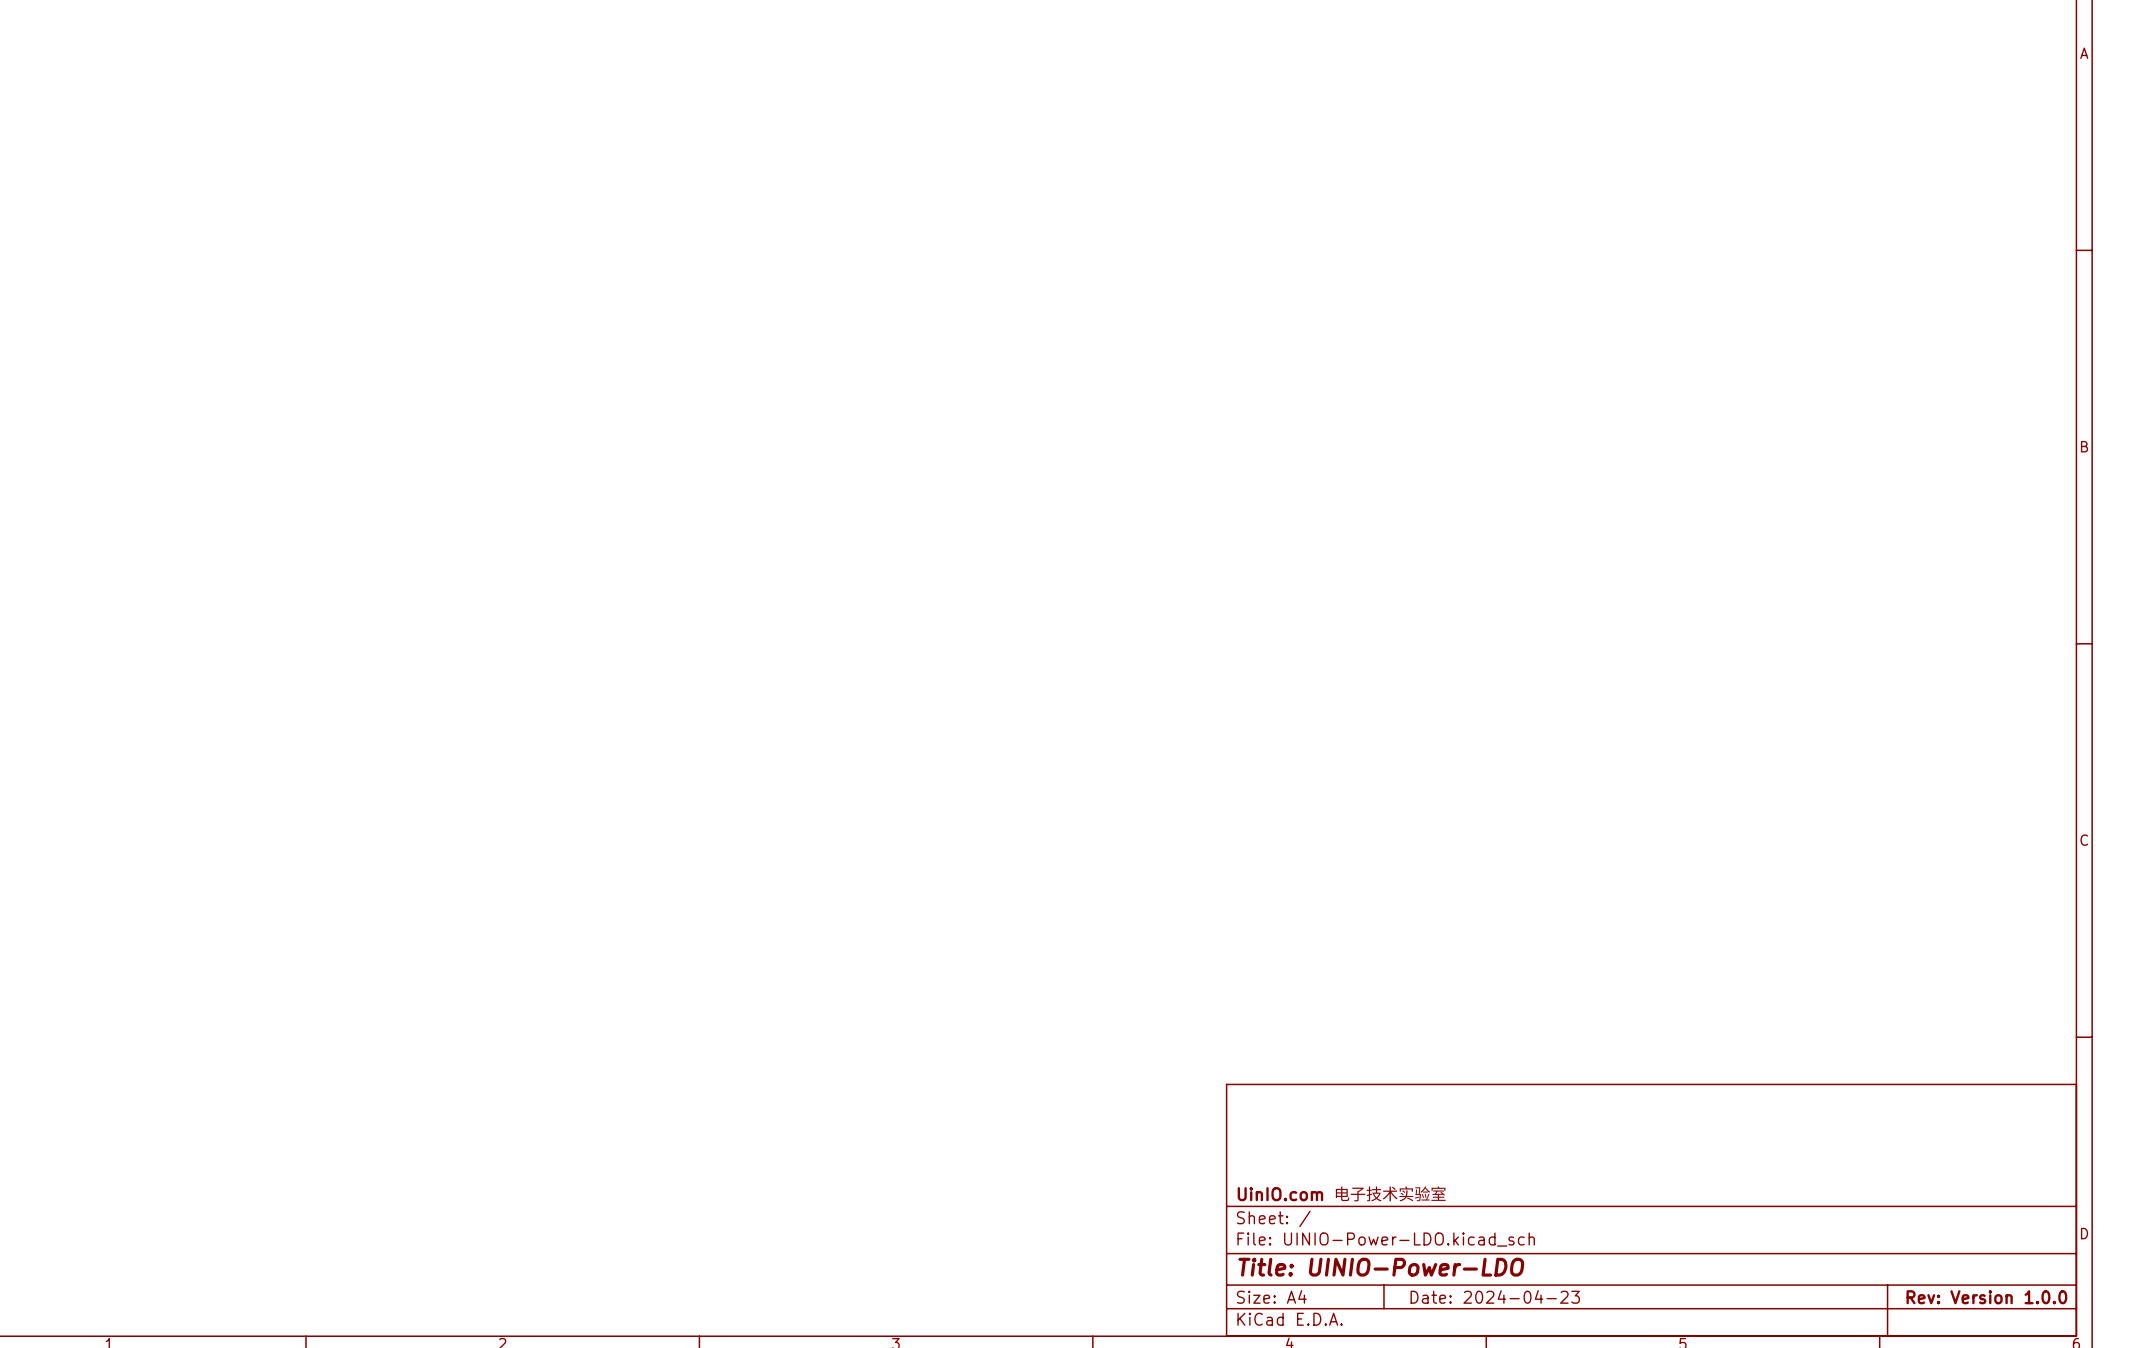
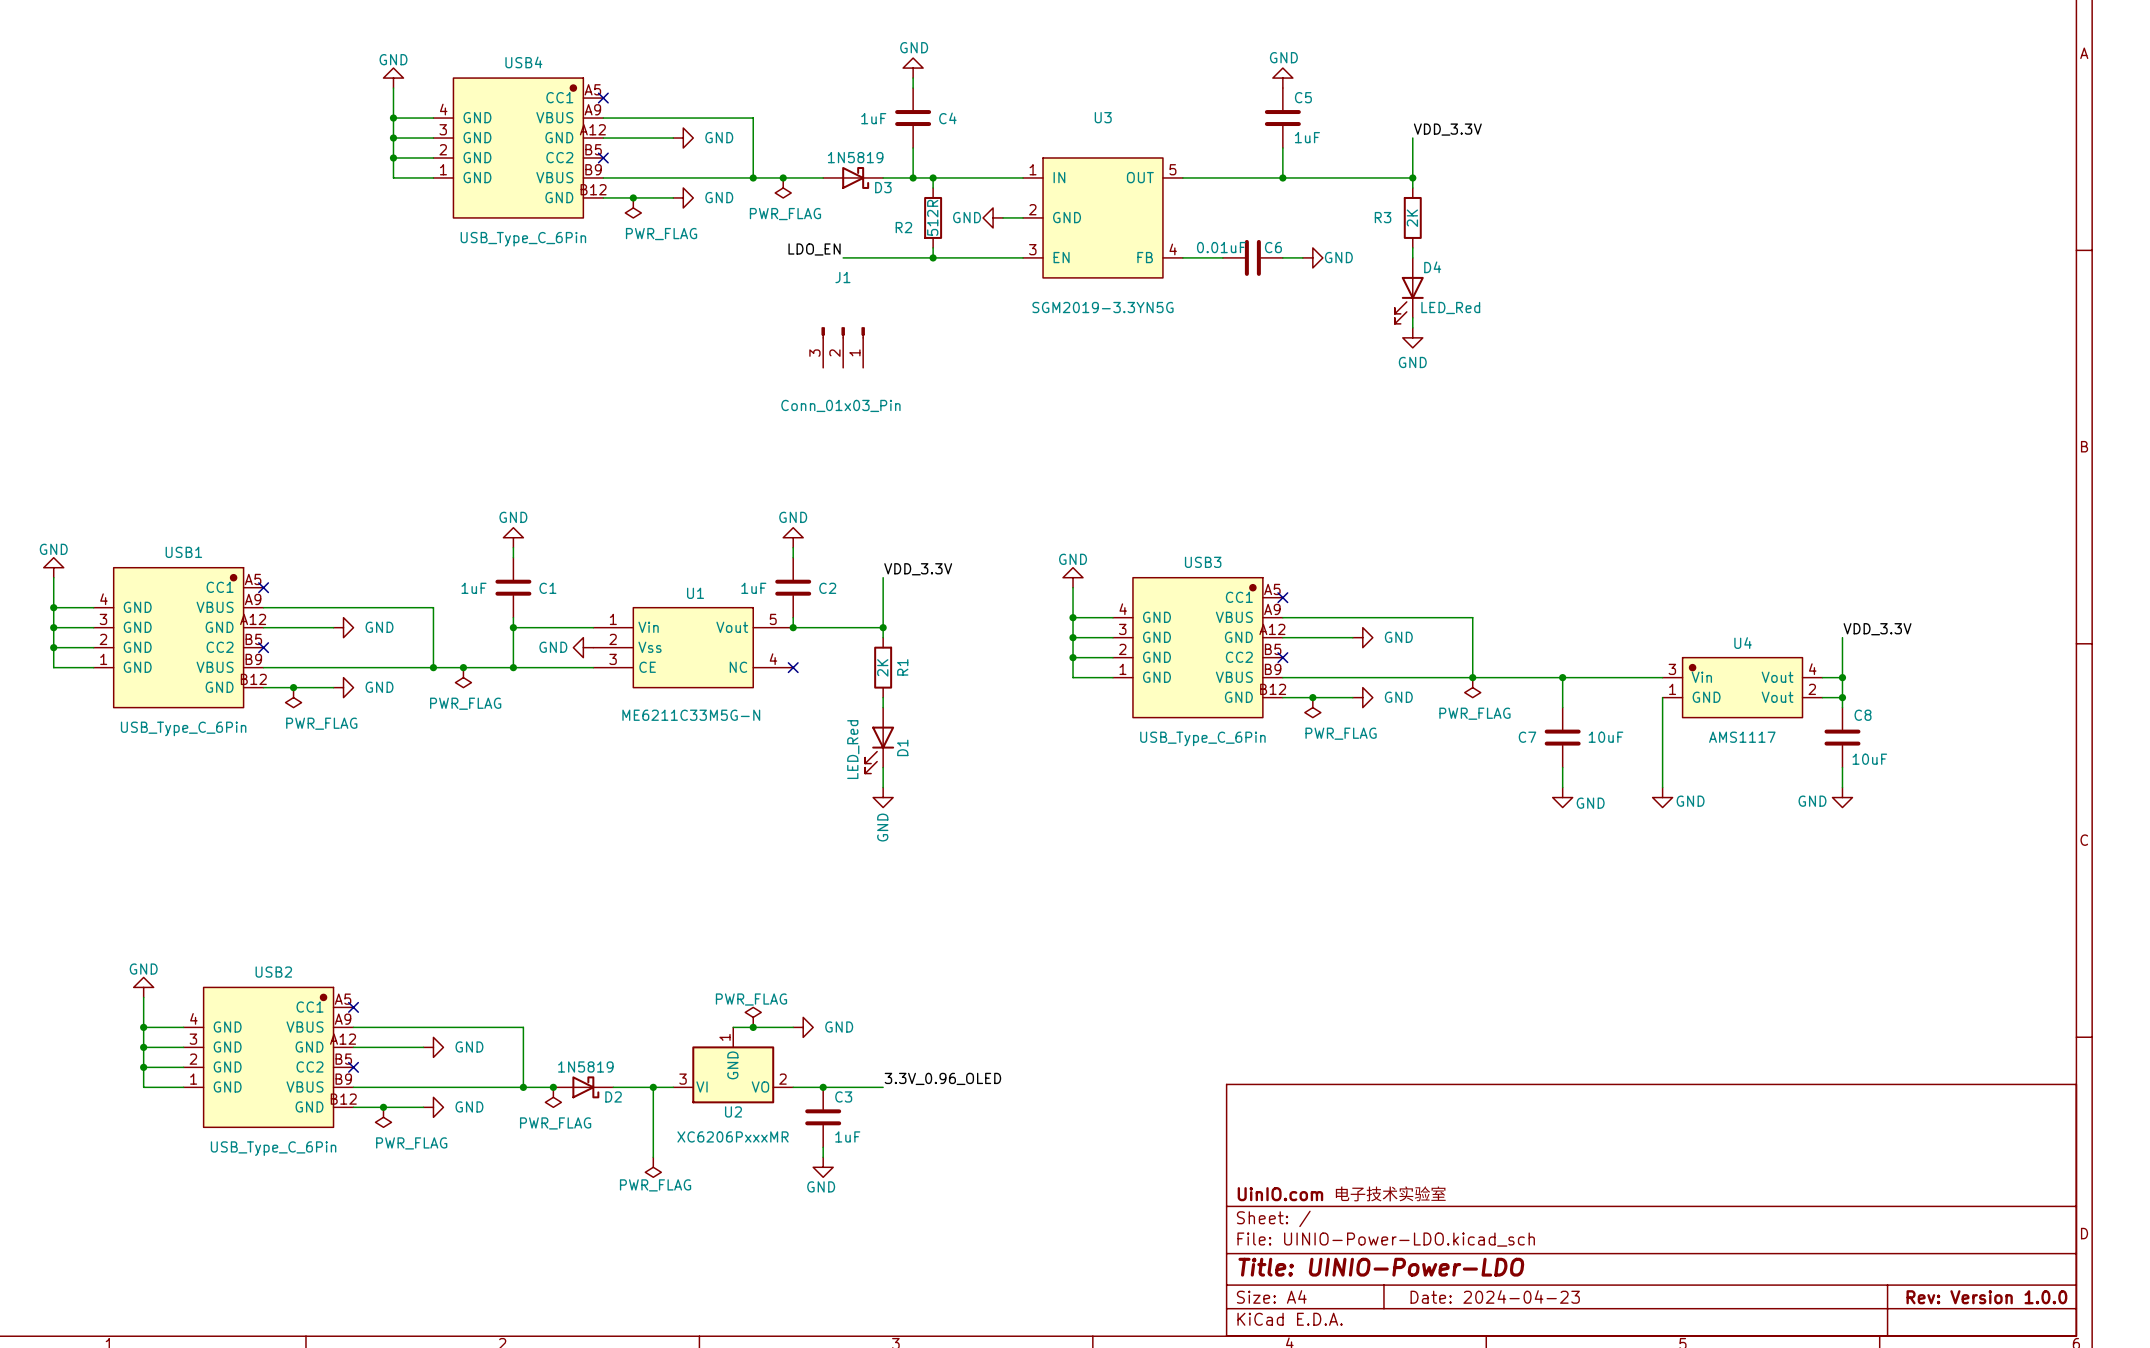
power symbol: none -> GND (913, 68)
power symbol: none -> GND (393, 78)
wire: none -> (913, 78) (913, 88)
power symbol: none -> GND (1282, 78)
wire: none -> (393, 88) (393, 177) (433, 177)
no-connect mark: none -> (603, 98)
wire: none -> (393, 118) (433, 118)
junction: none -> (393, 118)
wire: none -> (603, 118) (753, 118) (753, 177)
C4: none -> 1uF (913, 118)
C5: none -> 1uF (1282, 118)
label: none -> VDD_3.3V (1447, 129)
wire: none -> (393, 138) (433, 138)
junction: none -> (393, 138)
wire: none -> (603, 138) (673, 138)
power symbol: none -> GND (683, 138)
wire: none -> (1412, 138) (1412, 187)
USB4: none -> USB_Type_C_6Pin (518, 148)
wire: none -> (913, 148) (913, 177)
wire: none -> (1282, 148) (1282, 177)
wire: none -> (393, 158) (433, 158)
junction: none -> (393, 158)
no-connect mark: none -> (603, 158)
wire: none -> (603, 177) (823, 177)
junction: none -> (753, 177)
junction: none -> (783, 177)
D3: none -> 1N5819 (853, 177)
wire: none -> (883, 177) (1023, 177)
junction: none -> (913, 177)
wire: none -> (933, 177) (933, 187)
junction: none -> (933, 177)
wire: none -> (1182, 177) (1412, 177)
junction: none -> (1282, 177)
junction: none -> (1412, 177)
power symbol: none -> PWR_FLAG (783, 187)
wire: none -> (603, 197) (673, 197)
junction: none -> (633, 197)
power symbol: none -> GND (683, 197)
power symbol: none -> PWR_FLAG (633, 207)
R2: none -> 512R (933, 217)
power symbol: none -> GND (993, 217)
wire: none -> (1003, 217) (1023, 217)
U3: none -> SGM2019-3.3YN5G (1102, 217)
R3: none -> 2K (1412, 217)
wire: none -> (933, 247) (933, 257)
wire: none -> (1412, 247) (1412, 257)
label: none -> LDO_EN (814, 249)
wire: none -> (843, 257) (1023, 257)
junction: none -> (933, 257)
wire: none -> (1182, 257) (1222, 257)
C6: none -> 0.01uF (1252, 257)
wire: none -> (1282, 257) (1302, 257)
power symbol: none -> GND (1312, 257)
D4: none -> LED_Red (1409, 290)
wire: none -> (1412, 317) (1412, 327)
power symbol: none -> GND (1412, 337)
J1: none -> Conn_01x03_Pin (843, 347)
power symbol: none -> GND (513, 537)
power symbol: none -> GND (793, 537)
wire: none -> (513, 547) (513, 557)
wire: none -> (793, 547) (793, 557)
power symbol: none -> GND (53, 567)
label: none -> VDD_3.3V (918, 569)
wire: none -> (53, 577) (53, 667) (93, 667)
wire: none -> (883, 577) (883, 637)
power symbol: none -> GND (1073, 577)
no-connect mark: none -> (263, 587)
C1: none -> 1uF (513, 587)
C2: none -> 1uF (793, 587)
wire: none -> (1073, 587) (1073, 677) (1112, 677)
no-connect mark: none -> (1282, 597)
wire: none -> (53, 607) (93, 607)
junction: none -> (53, 607)
wire: none -> (263, 607) (433, 607) (433, 667)
wire: none -> (513, 617) (513, 667)
wire: none -> (793, 617) (793, 627) (883, 627)
wire: none -> (1073, 617) (1112, 617)
junction: none -> (1073, 617)
wire: none -> (1282, 617) (1472, 617) (1472, 677)
wire: none -> (53, 627) (93, 627)
junction: none -> (53, 627)
wire: none -> (263, 627) (333, 627)
power symbol: none -> GND (343, 627)
wire: none -> (513, 627) (593, 627)
junction: none -> (513, 627)
junction: none -> (793, 627)
junction: none -> (883, 627)
label: none -> VDD_3.3V (1877, 629)
USB1: none -> USB_Type_C_6Pin (178, 637)
wire: none -> (1073, 637) (1112, 637)
junction: none -> (1073, 637)
wire: none -> (1282, 637) (1352, 637)
power symbol: none -> GND (1362, 637)
wire: none -> (1842, 637) (1842, 707)
wire: none -> (53, 647) (93, 647)
junction: none -> (53, 647)
no-connect mark: none -> (263, 647)
power symbol: none -> GND (583, 647)
U1: none -> ME6211C33M5G-N (693, 647)
USB3: none -> USB_Type_C_6Pin (1197, 647)
wire: none -> (1073, 657) (1112, 657)
junction: none -> (1073, 657)
no-connect mark: none -> (1282, 657)
wire: none -> (263, 667) (593, 667)
junction: none -> (433, 667)
junction: none -> (463, 667)
junction: none -> (513, 667)
no-connect mark: none -> (793, 667)
R1: none -> 2K (883, 667)
power symbol: none -> PWR_FLAG (463, 677)
wire: none -> (1282, 677) (1662, 677)
junction: none -> (1472, 677)
wire: none -> (1562, 677) (1562, 707)
junction: none -> (1562, 677)
wire: none -> (1822, 677) (1842, 677)
junction: none -> (1842, 677)
wire: none -> (263, 687) (333, 687)
junction: none -> (293, 687)
power symbol: none -> GND (343, 687)
power symbol: none -> PWR_FLAG (1472, 687)
U4: none -> AMS1117 (1742, 687)
power symbol: none -> PWR_FLAG (293, 697)
wire: none -> (883, 697) (883, 707)
wire: none -> (1282, 697) (1352, 697)
junction: none -> (1312, 697)
power symbol: none -> GND (1362, 697)
wire: none -> (1662, 697) (1662, 787)
wire: none -> (1822, 697) (1842, 697)
junction: none -> (1842, 697)
power symbol: none -> PWR_FLAG (1312, 707)
C7: none -> 10uF (1562, 737)
C8: none -> 10uF (1842, 737)
D1: none -> LED_Red (879, 740)
wire: none -> (883, 767) (883, 787)
wire: none -> (1562, 767) (1562, 787)
wire: none -> (1842, 767) (1842, 787)
power symbol: none -> GND (883, 797)
power symbol: none -> GND (1562, 797)
power symbol: none -> GND (1662, 797)
power symbol: none -> GND (1842, 797)
power symbol: none -> GND (143, 987)
wire: none -> (143, 997) (143, 1087) (183, 1087)
no-connect mark: none -> (353, 1007)
power symbol: none -> PWR_FLAG (753, 1017)
wire: none -> (143, 1027) (183, 1027)
junction: none -> (143, 1027)
wire: none -> (353, 1027) (523, 1027) (523, 1087)
wire: none -> (733, 1027) (793, 1027)
junction: none -> (753, 1027)
power symbol: none -> GND (803, 1027)
wire: none -> (143, 1047) (183, 1047)
junction: none -> (143, 1047)
wire: none -> (353, 1047) (423, 1047)
power symbol: none -> GND (433, 1047)
USB2: none -> USB_Type_C_6Pin (268, 1057)
U2: none -> XC6206PxxxMR (733, 1065)
wire: none -> (143, 1067) (183, 1067)
junction: none -> (143, 1067)
no-connect mark: none -> (353, 1067)
label: none -> 3.3V_0.96_OLED (942, 1078)
wire: none -> (353, 1087) (553, 1087)
junction: none -> (523, 1087)
junction: none -> (553, 1087)
D2: none -> 1N5819 (583, 1087)
wire: none -> (613, 1087) (673, 1087)
wire: none -> (653, 1087) (653, 1157)
junction: none -> (653, 1087)
wire: none -> (793, 1087) (883, 1087)
junction: none -> (823, 1087)
power symbol: none -> PWR_FLAG (553, 1097)
wire: none -> (353, 1107) (423, 1107)
junction: none -> (383, 1107)
power symbol: none -> GND (433, 1107)
power symbol: none -> PWR_FLAG (383, 1117)
C3: none -> 1uF (823, 1117)
wire: none -> (823, 1147) (823, 1157)
power symbol: none -> PWR_FLAG (653, 1167)
power symbol: none -> GND (823, 1167)

